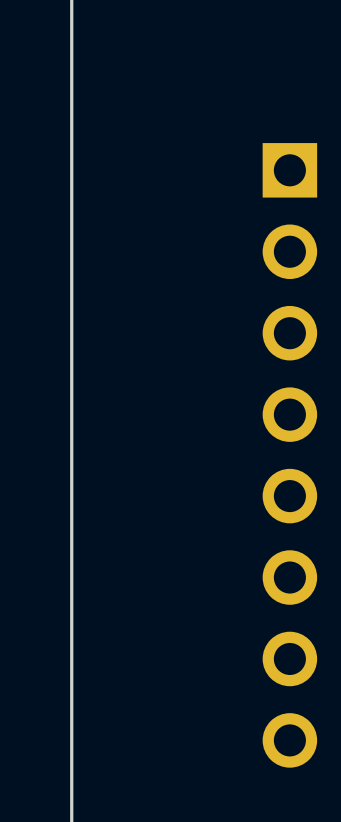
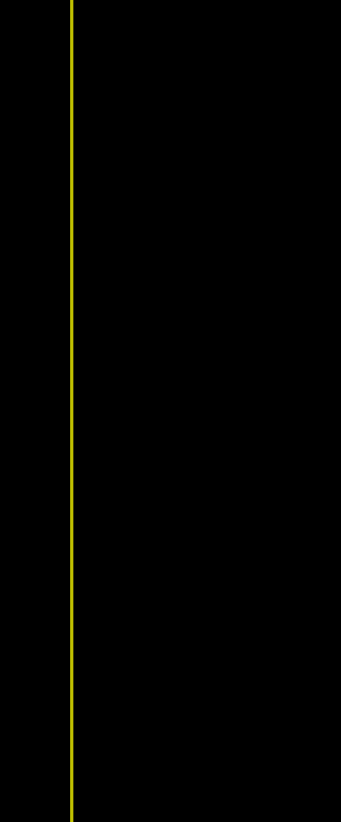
part: (289, 455) -> none

